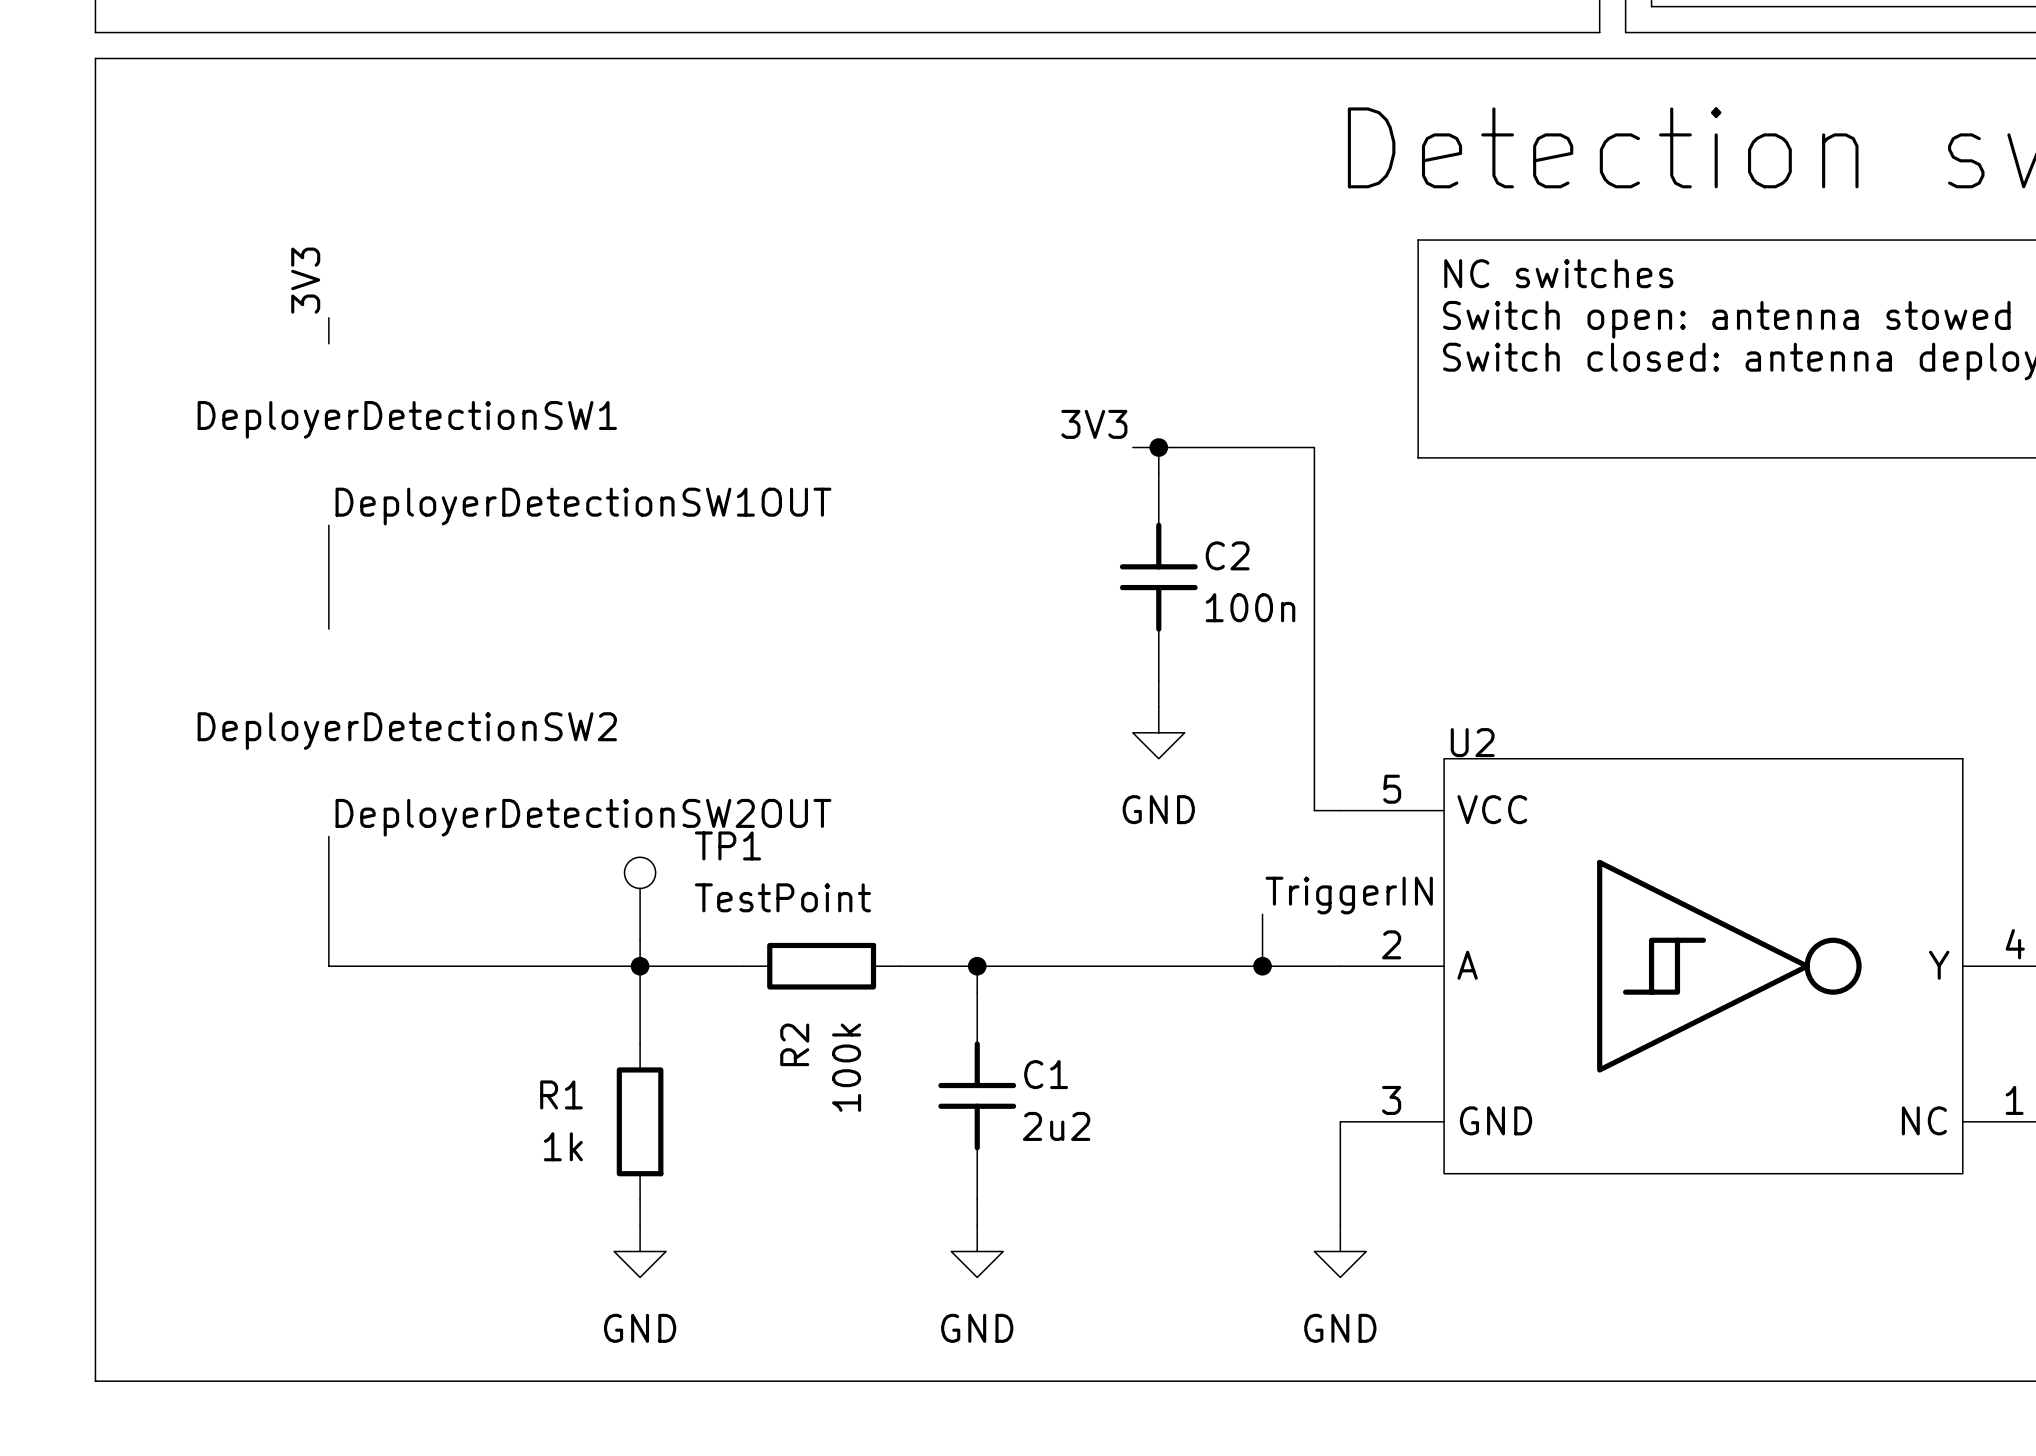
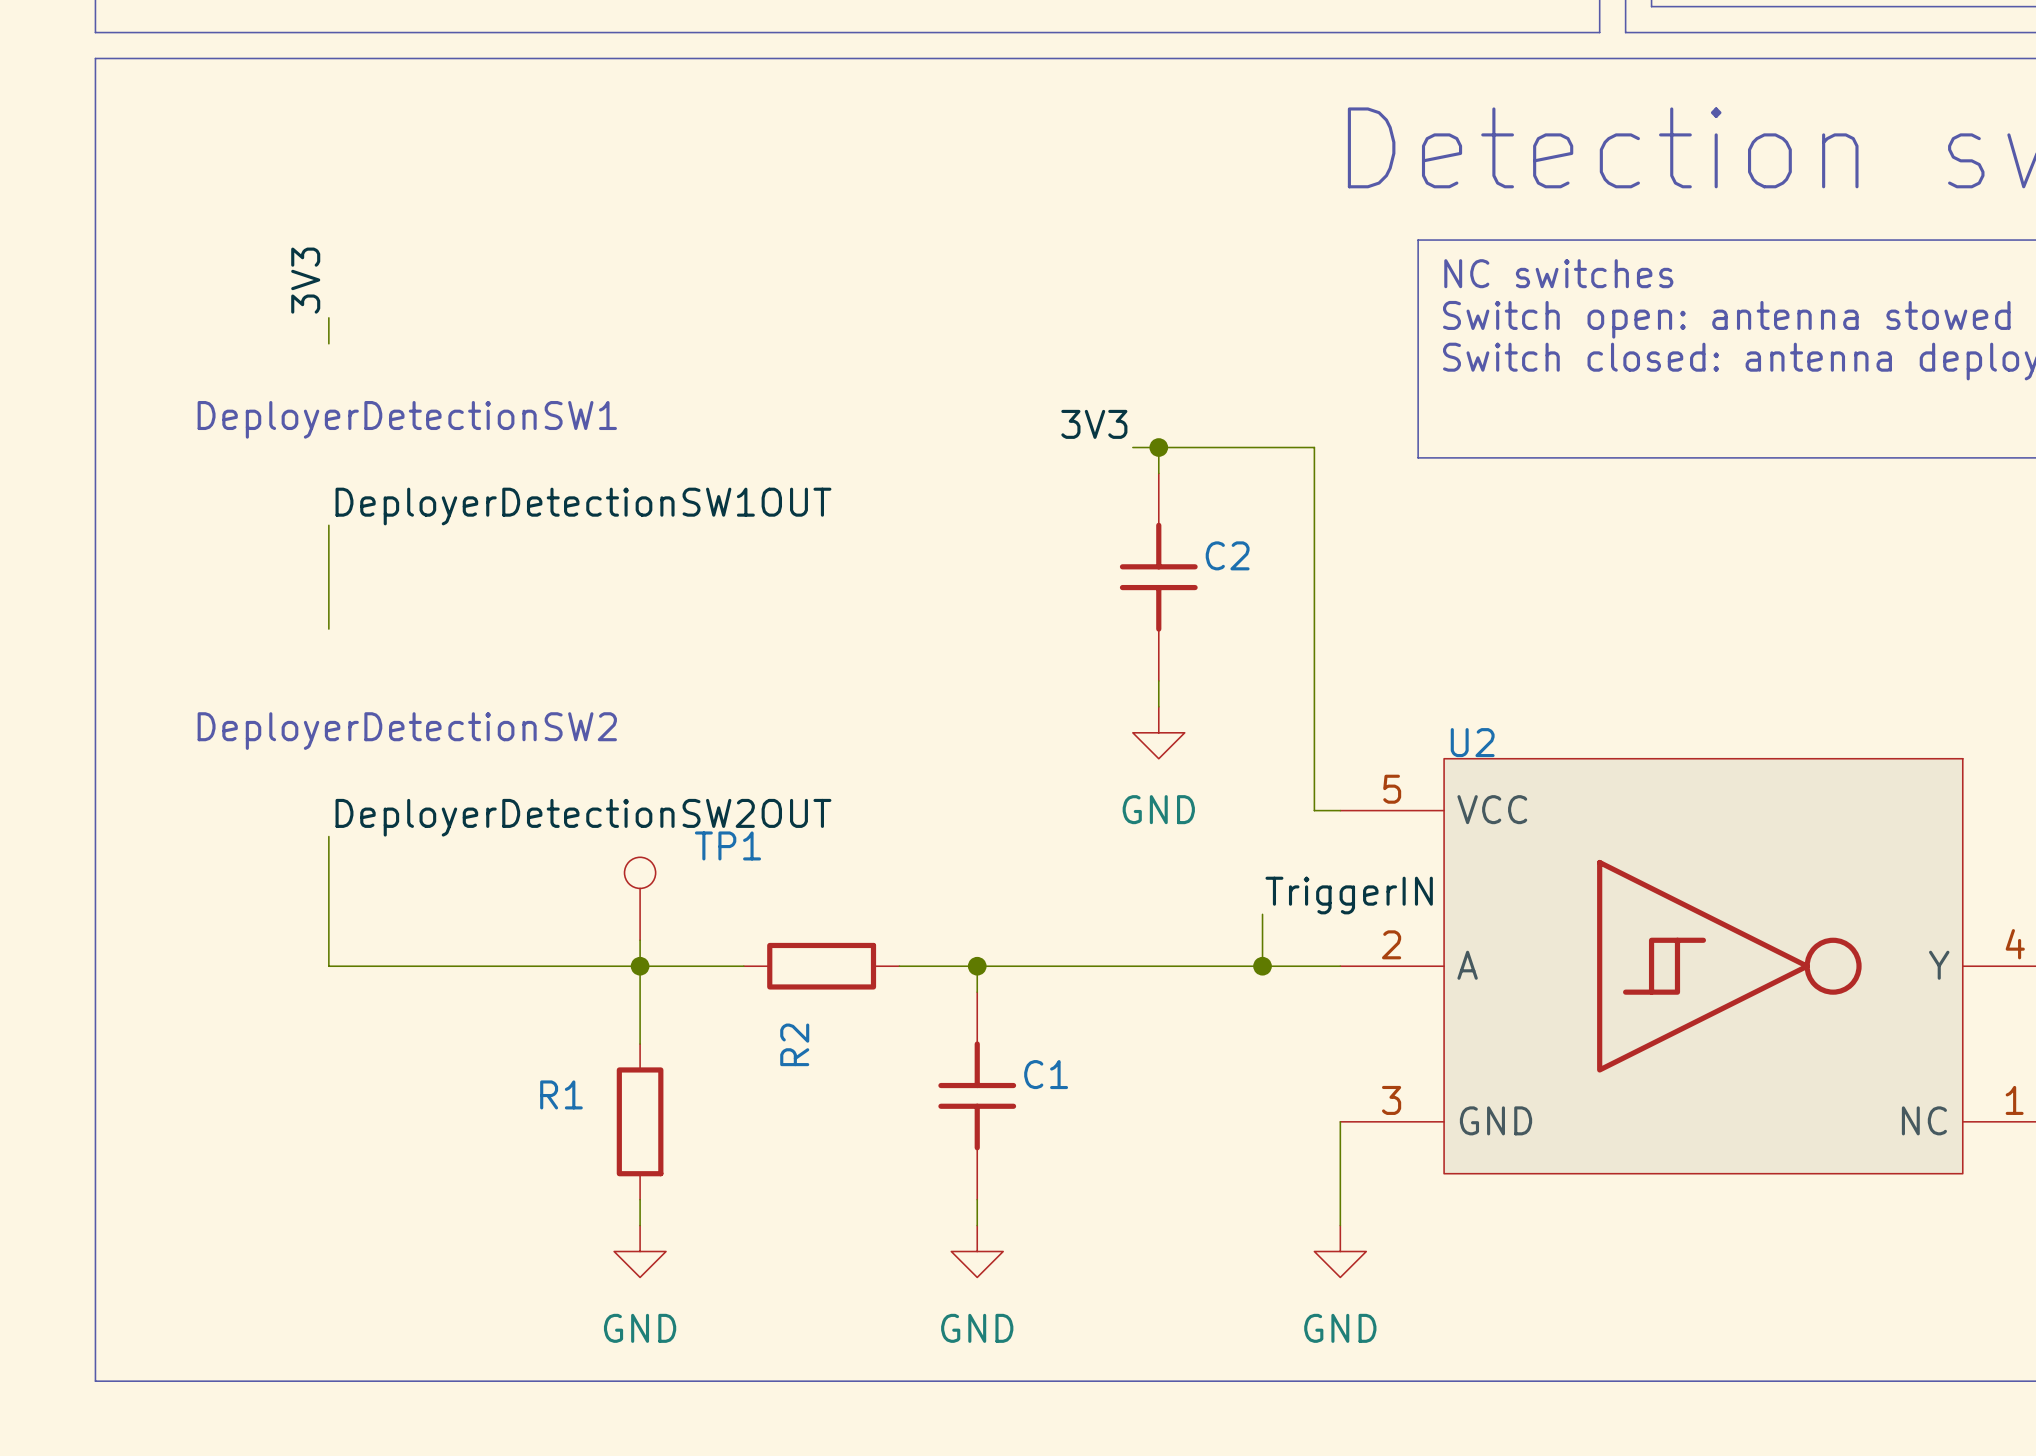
C2 value: 100n (1250, 607) -> none
TP1 value: TestPoint (782, 897) -> none
R2 value: 100k (846, 1067) -> none
C1 value: 2u2 (1056, 1126) -> none
R1 value: 1k (563, 1146) -> none

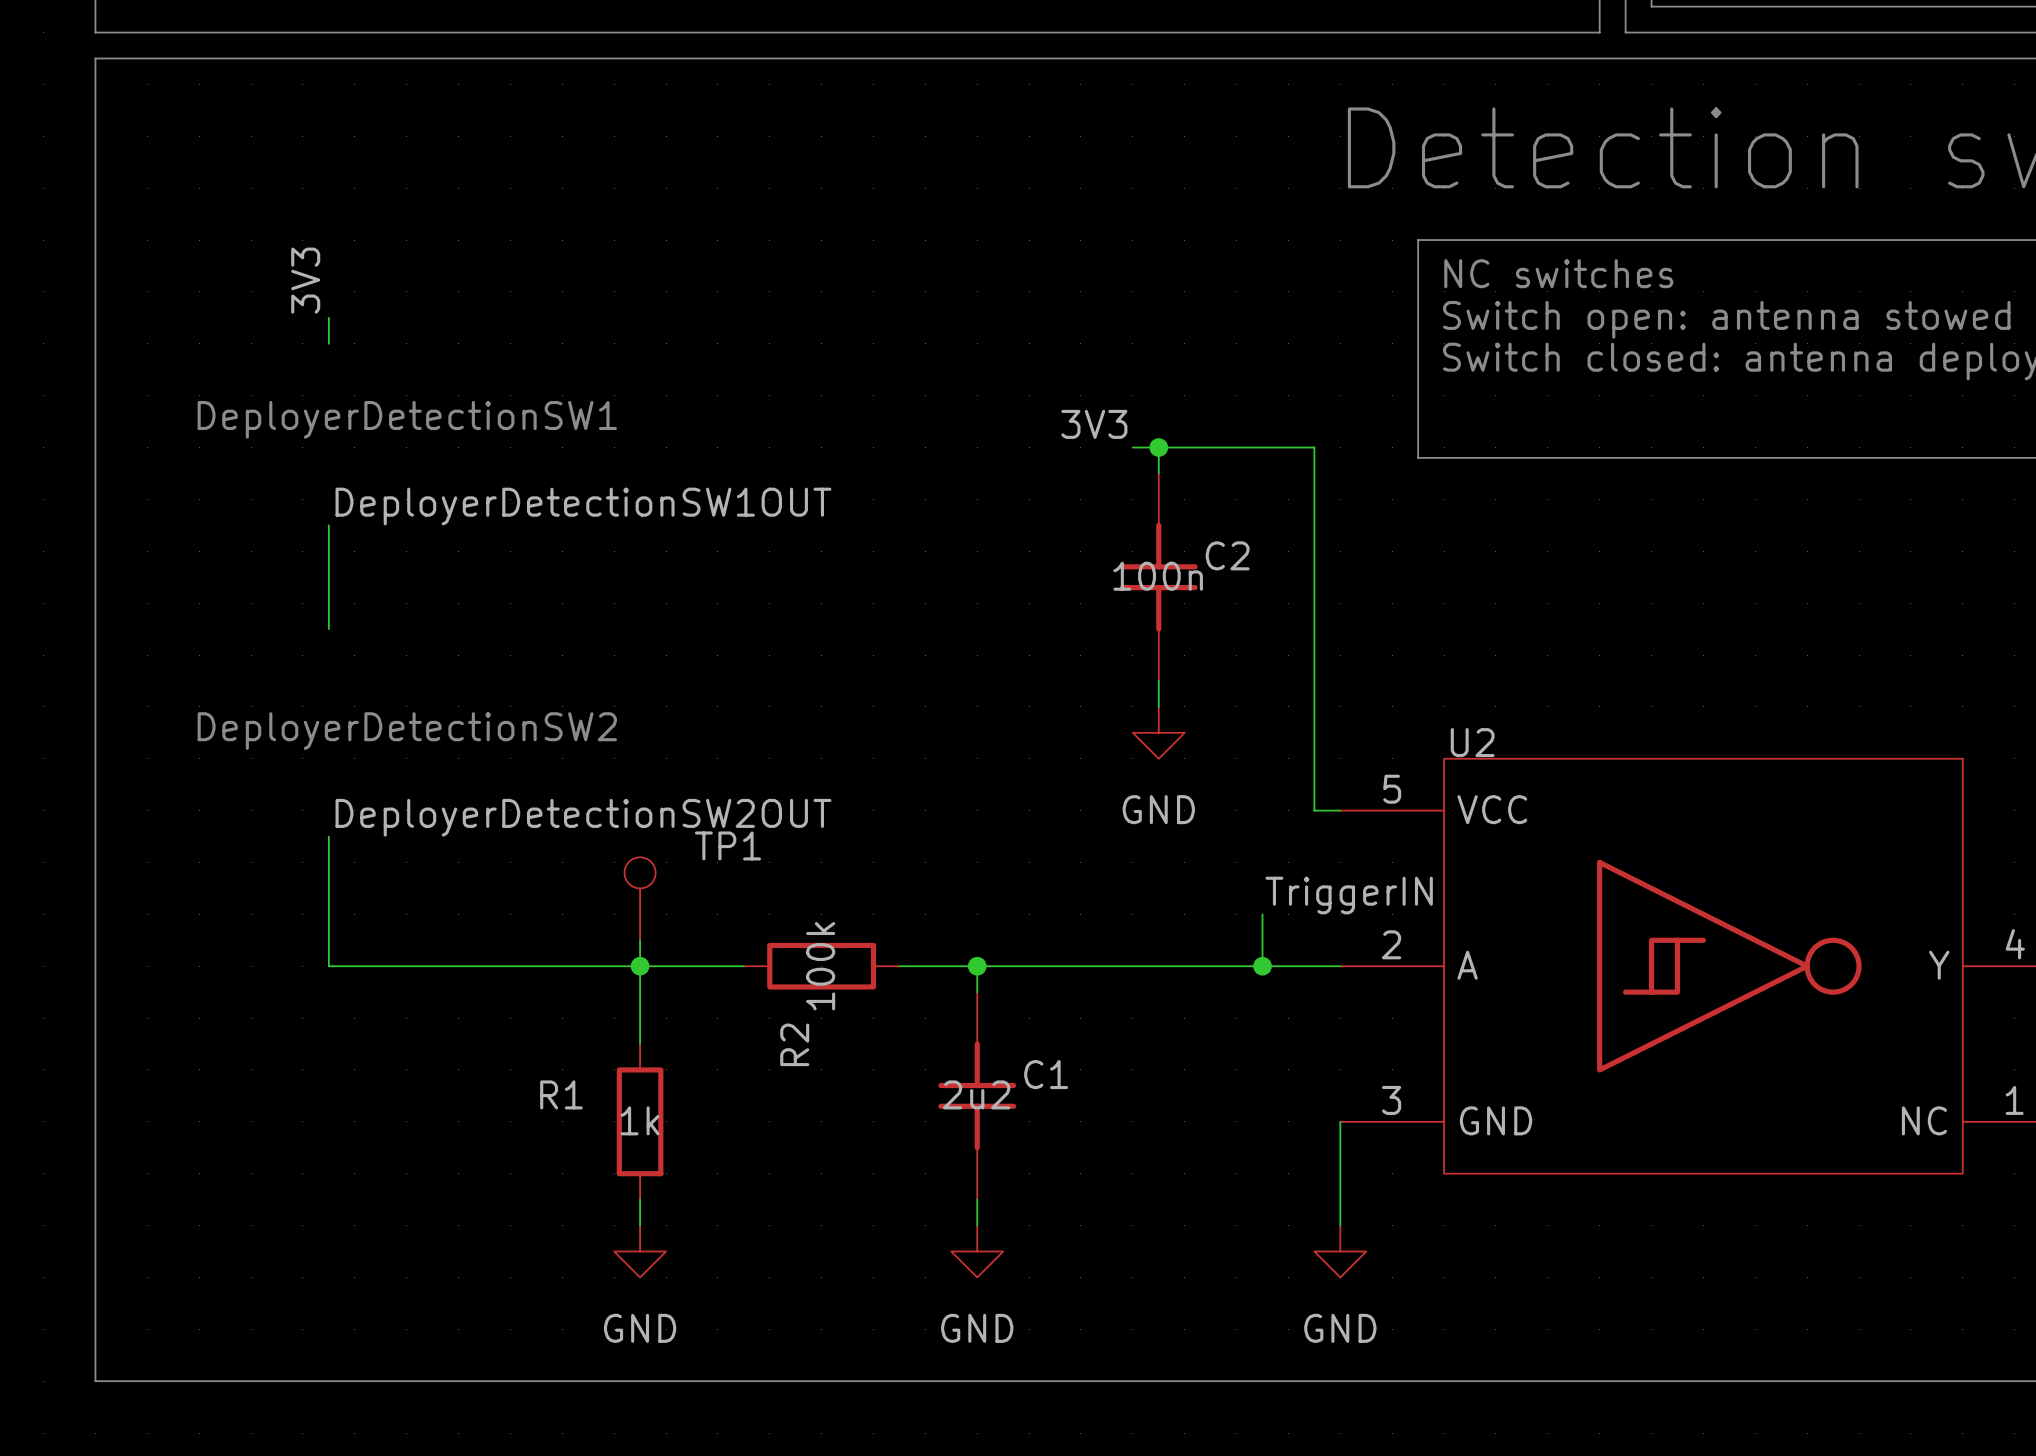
C2 value: none -> 100n (1158, 576)
R2 value: none -> 100k (820, 966)
C1 value: none -> 2u2 (976, 1094)
R1 value: none -> 1k (640, 1120)

